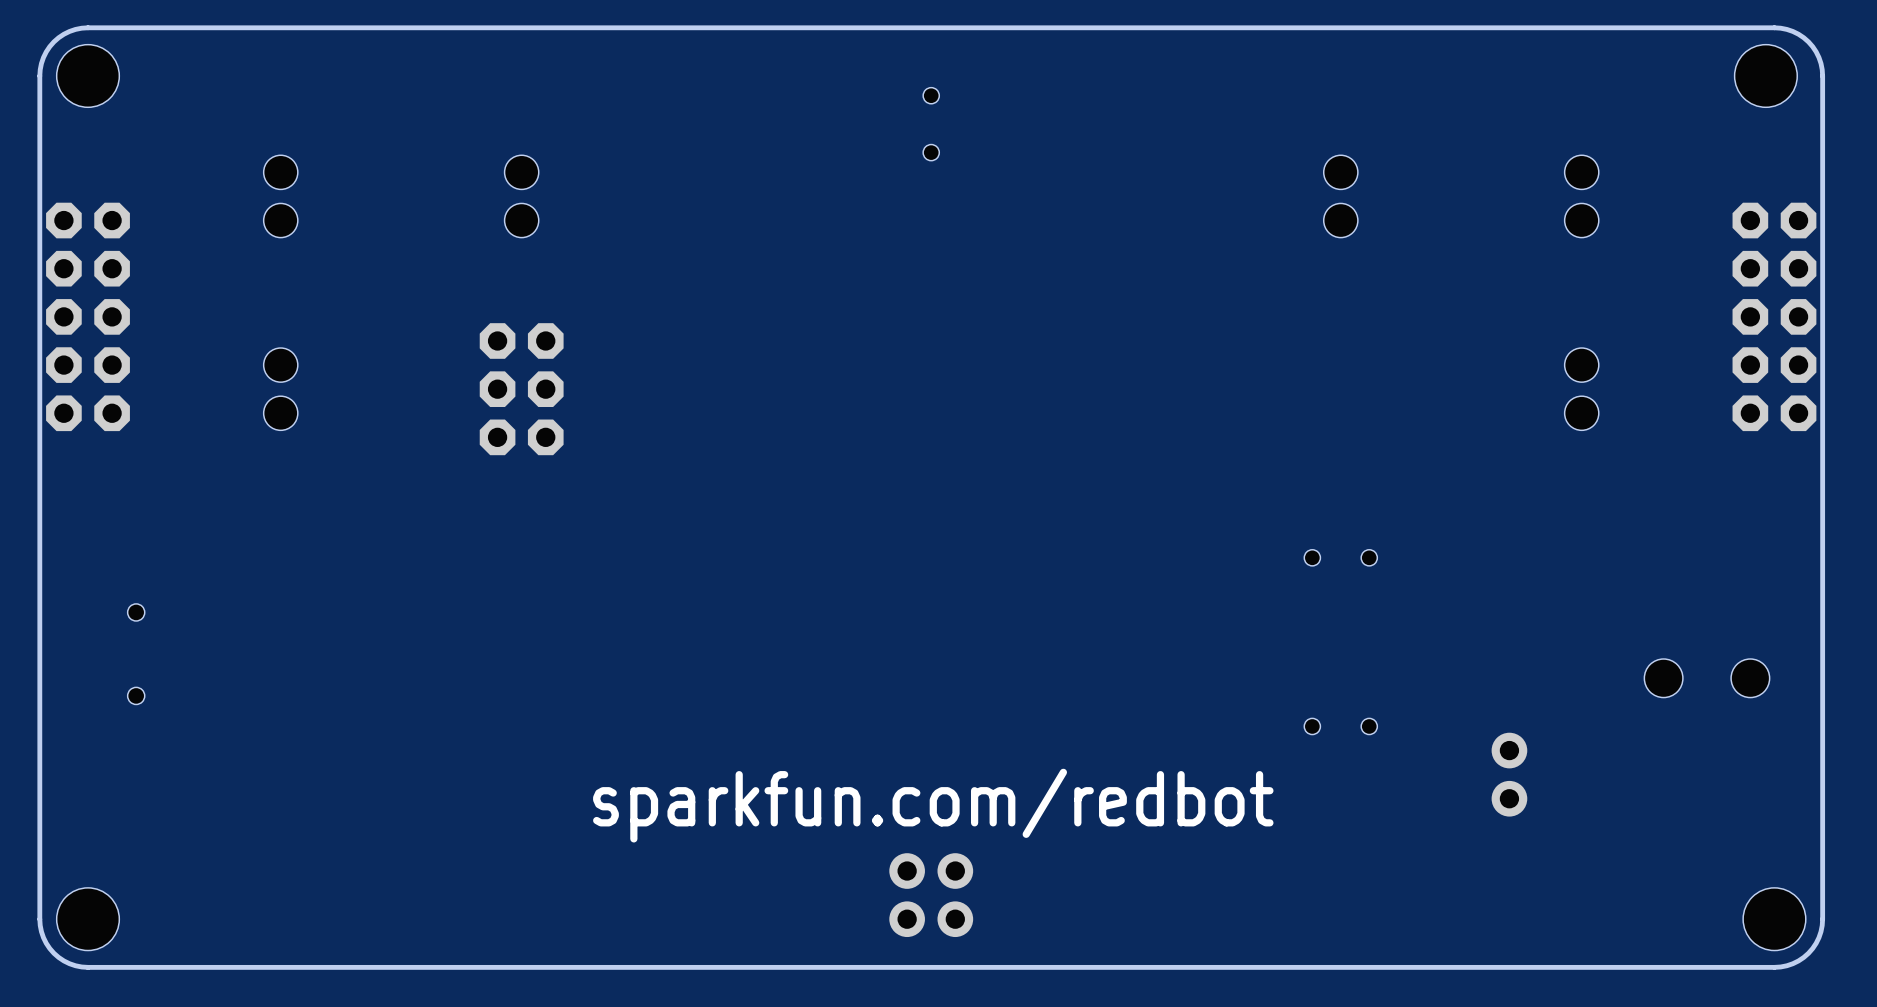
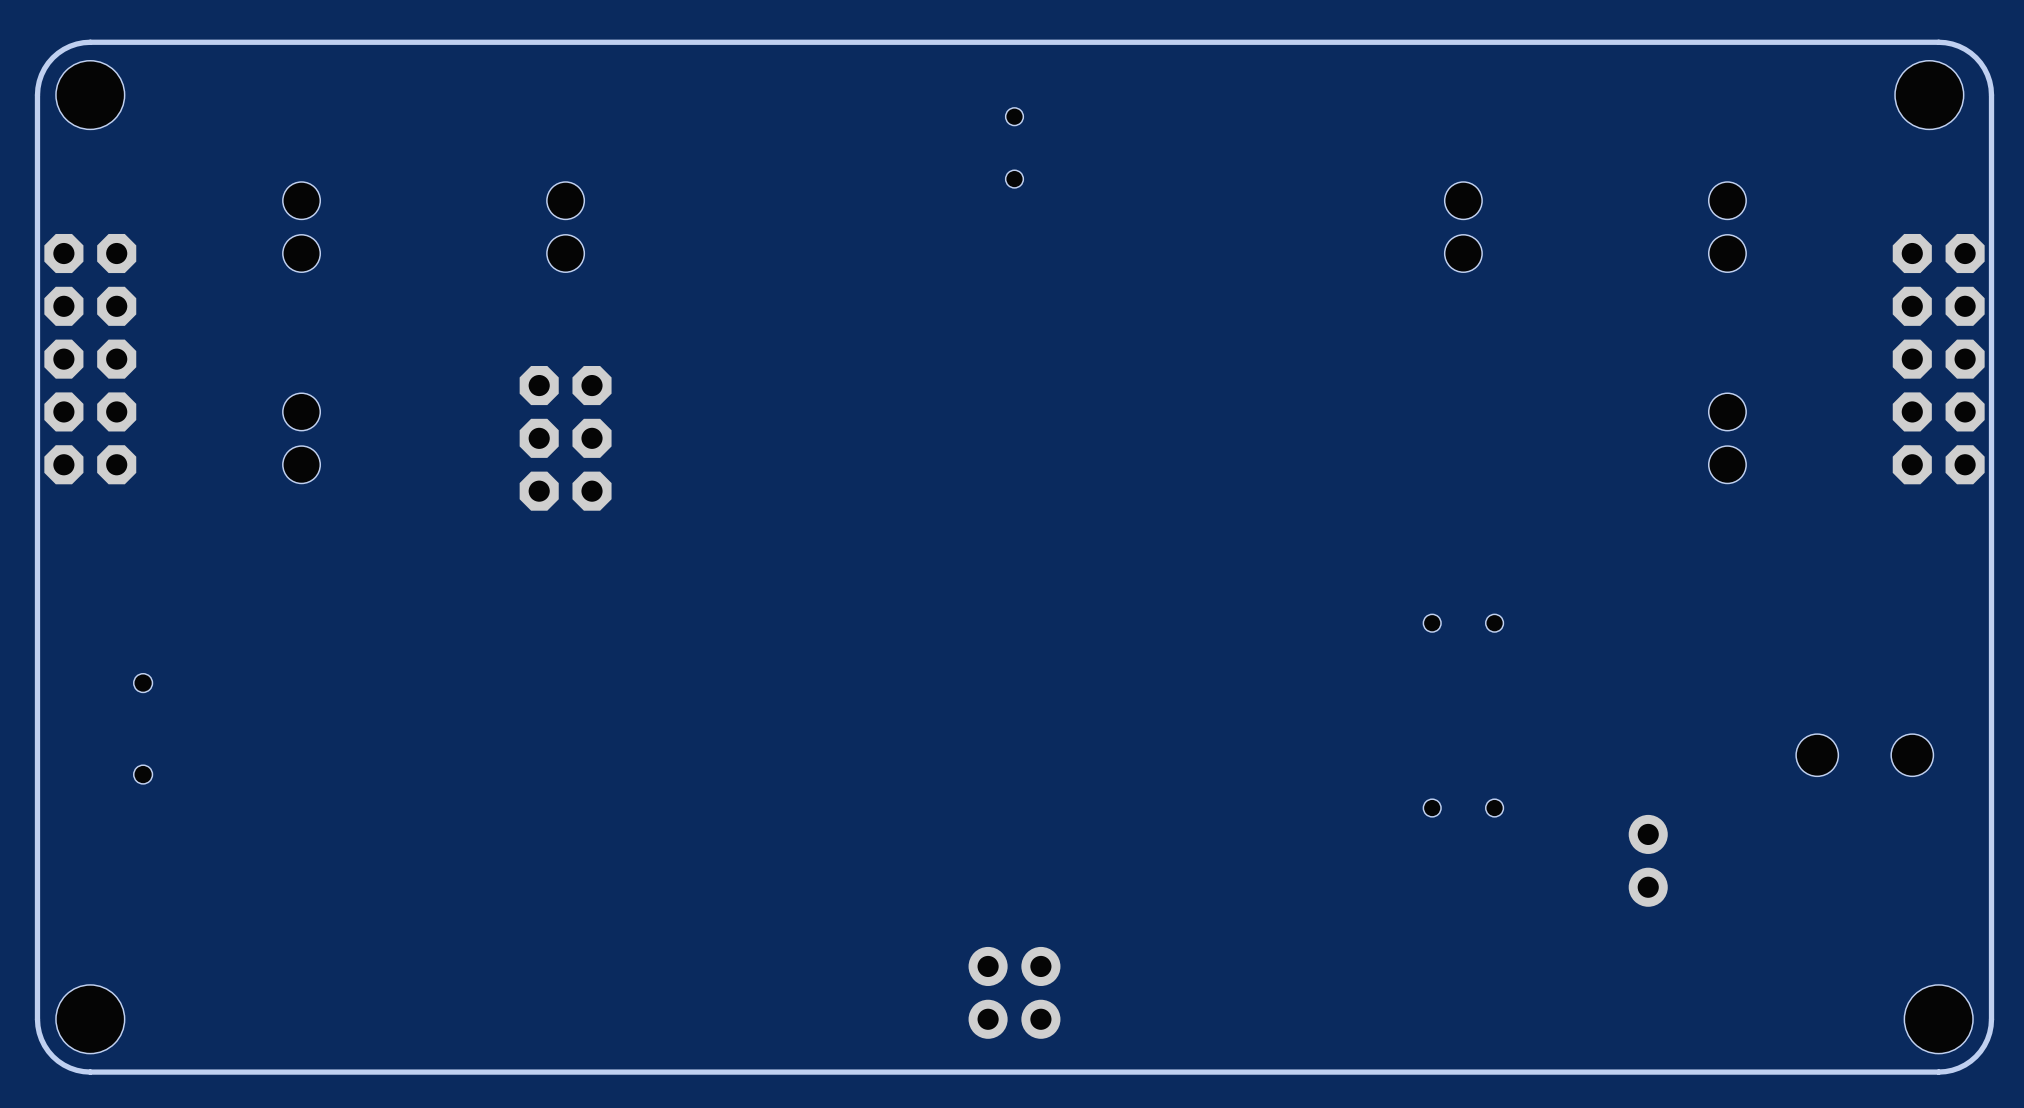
text: sparkfun.com/redbot (933, 805) -> none

